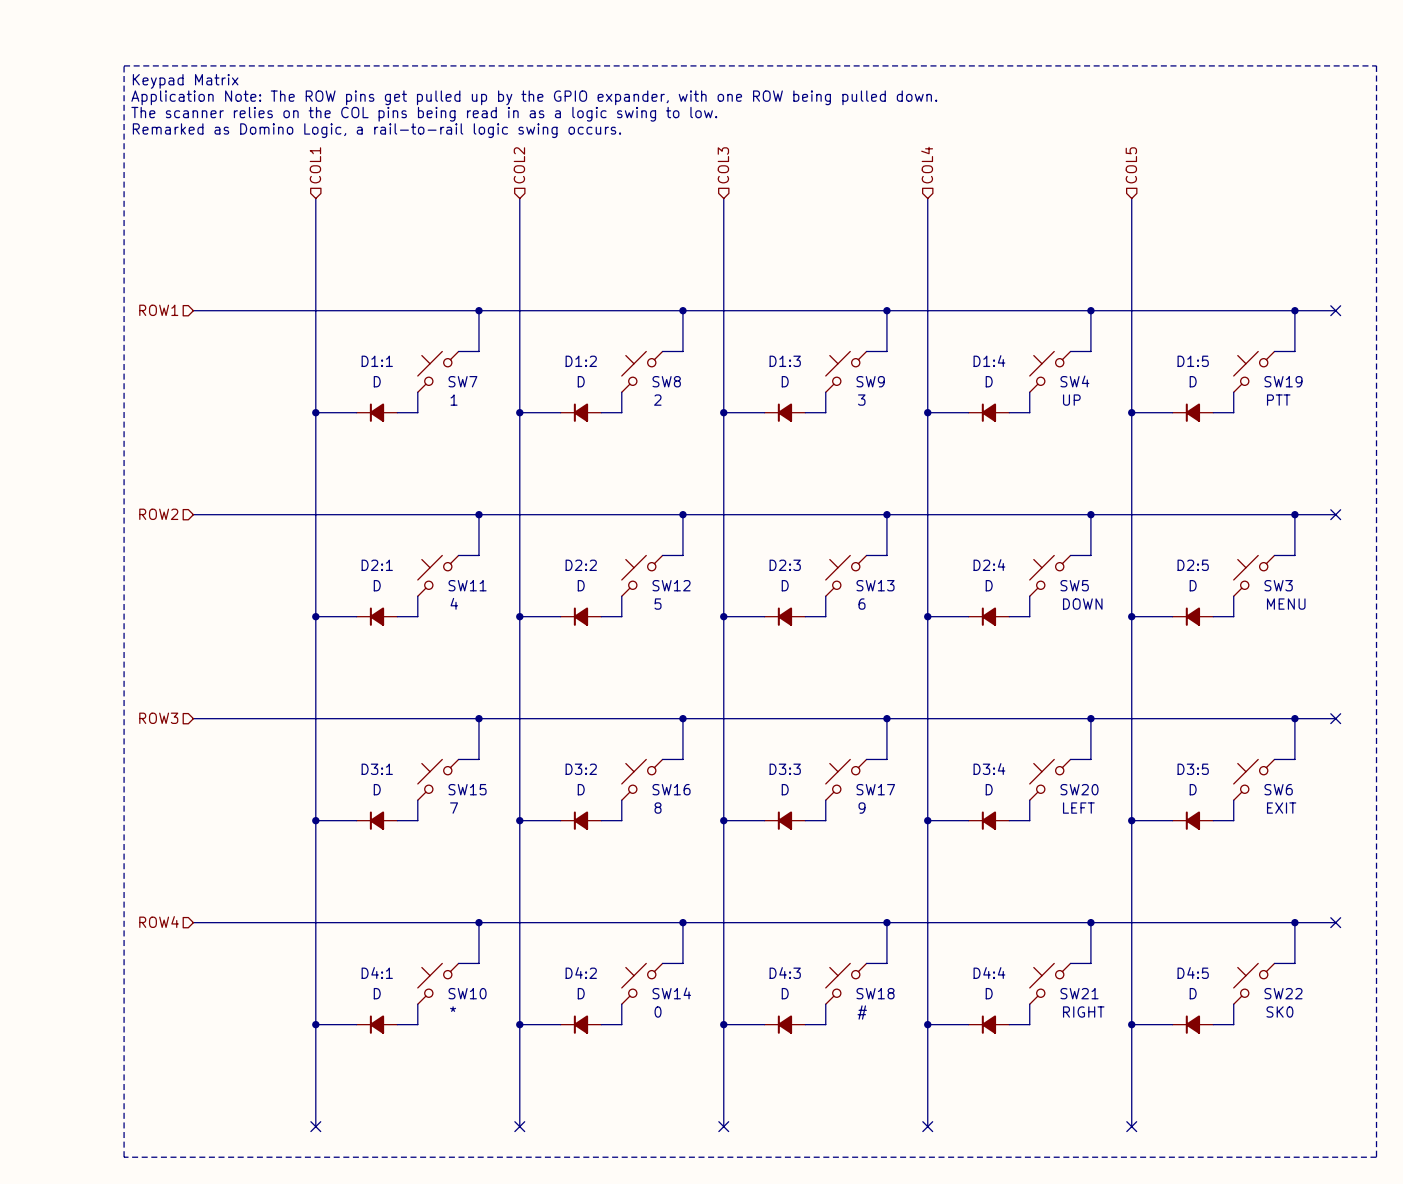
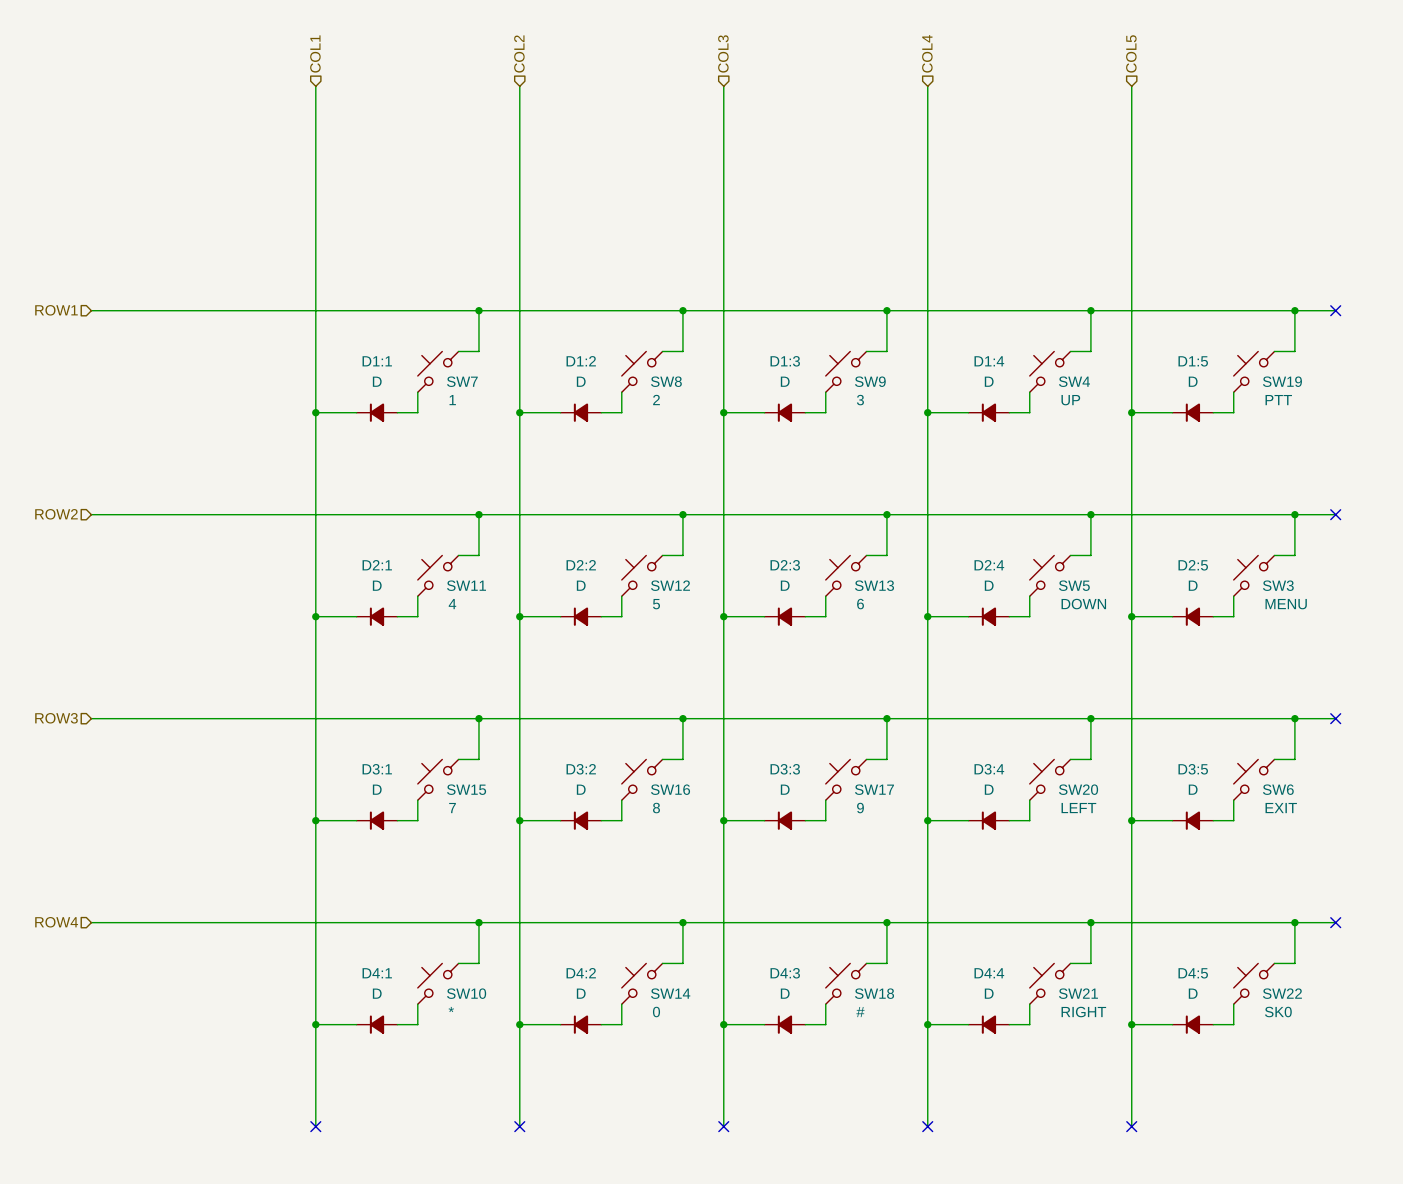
line: (124, 65) (1376, 65) (1376, 1157) (124, 1157) (124, 65) -> none
text: Keypad Matrix (185, 81) -> none
wire: none -> (315, 86) (315, 198)
wire: none -> (519, 86) (519, 198)
wire: none -> (723, 86) (723, 198)
wire: none -> (927, 86) (927, 198)
wire: none -> (1131, 86) (1131, 198)
text: Application Note: The ROW pins get pulled up by the GPIO expander, with one ROW being pulled down. (534, 97) -> none
text: The scanner relies on the COL pins being read in as a logic swing to low. (424, 114) -> none
text: Remarked as Domino Logic, a rail-to-rail logic swing occurs. (376, 130) -> none
hierarchical label position: COL1 (315, 165) -> COL1 (315, 53)
hierarchical label position: COL2 (519, 165) -> COL2 (519, 54)
hierarchical label position: COL3 (723, 165) -> COL3 (723, 53)
hierarchical label position: COL4 (927, 165) -> COL4 (927, 53)
hierarchical label position: COL5 (1131, 165) -> COL5 (1131, 53)
wire: none -> (91, 310) (193, 310)
hierarchical label position: ROW1 (158, 310) -> ROW1 (56, 310)
wire: none -> (91, 514) (193, 514)
hierarchical label position: ROW2 (158, 514) -> ROW2 (56, 514)
wire: none -> (91, 718) (193, 718)
hierarchical label position: ROW3 (158, 718) -> ROW3 (56, 718)
wire: none -> (91, 922) (193, 922)
hierarchical label position: ROW4 (159, 922) -> ROW4 (56, 922)

